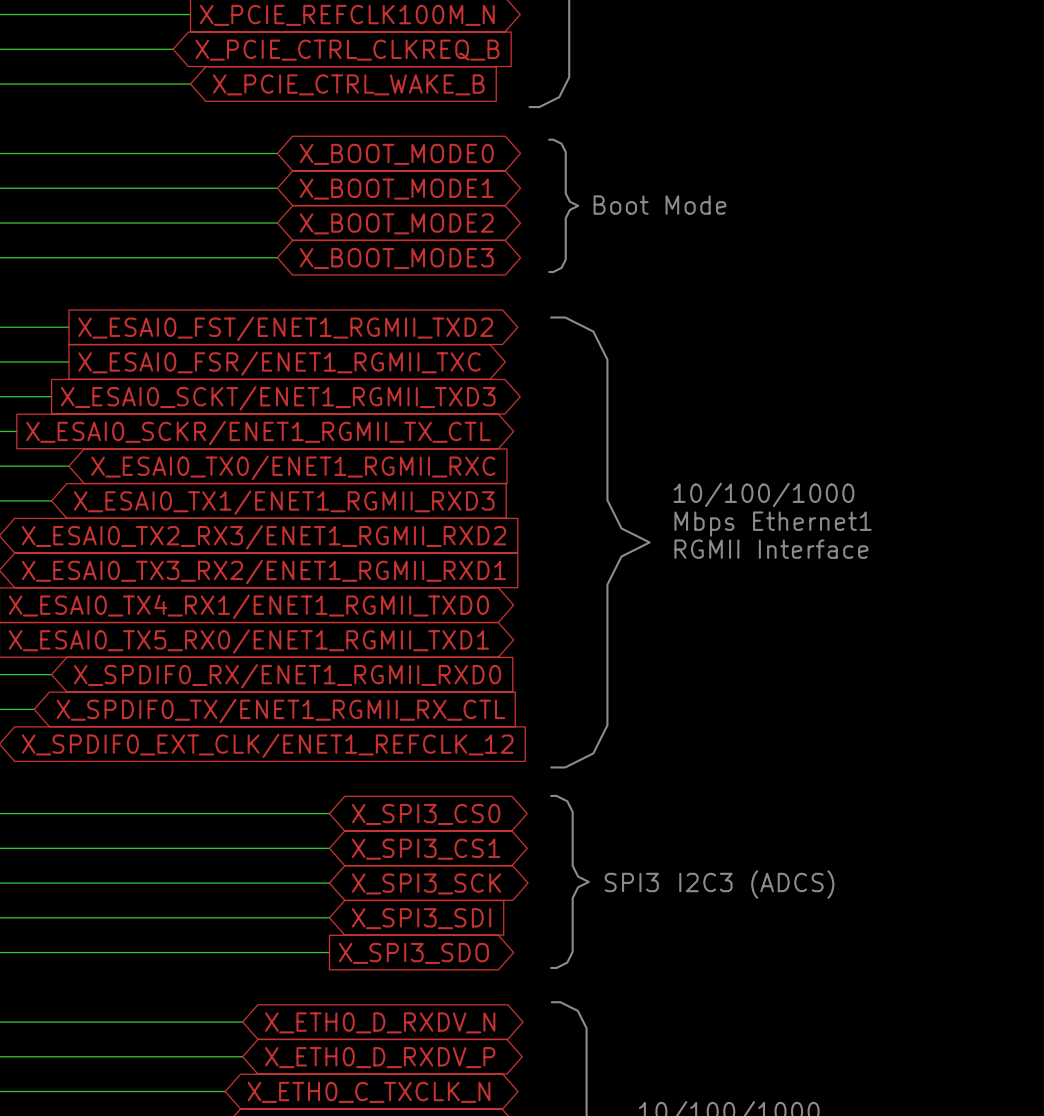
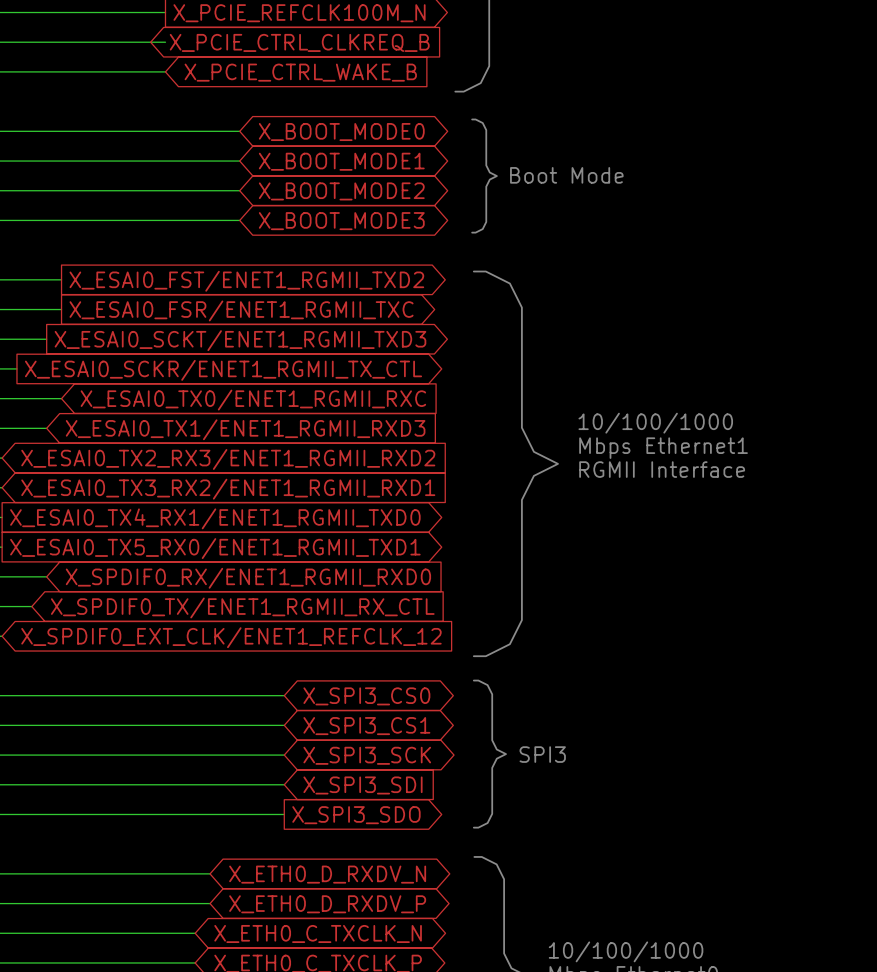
wire: none -> (150, 42) (165, 42)
text: I2C3 (ADCS) (756, 884) -> none

